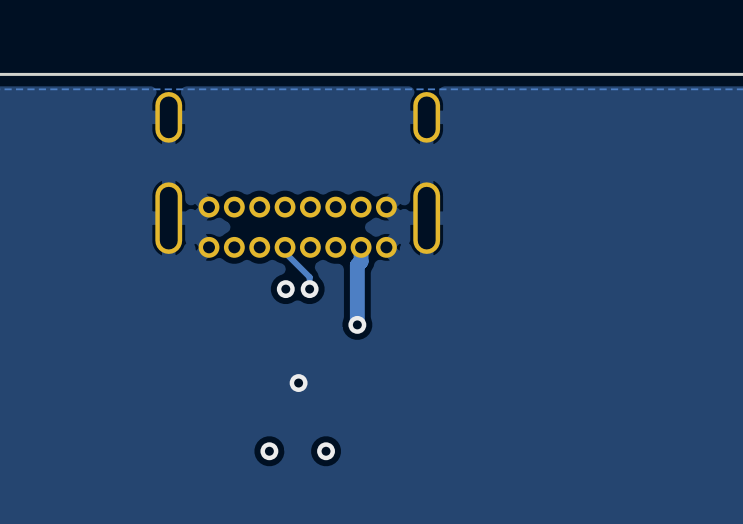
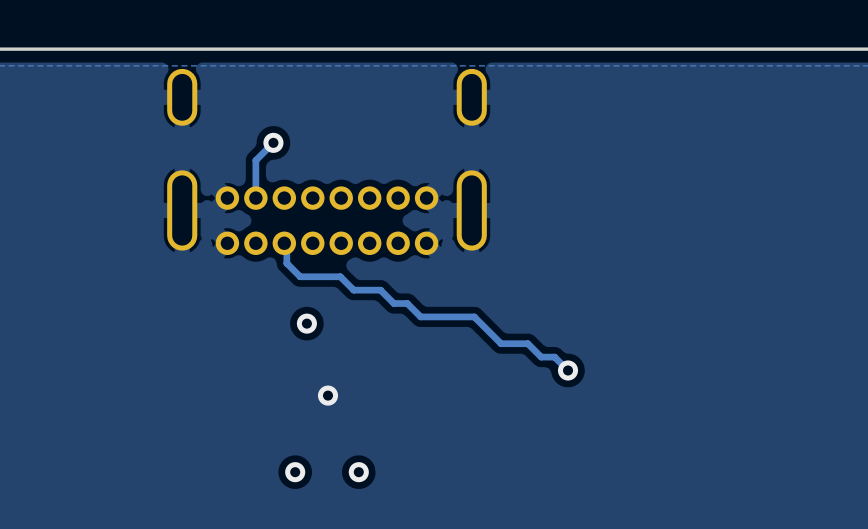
track: none -> (273, 142) (255, 160) (255, 198)
via: none -> (273, 142)
track: none -> (284, 243) (286, 245) (286, 263) (300, 276) (340, 276) (353, 290) (380, 290) (393, 303) (407, 303) (420, 316) (474, 316) (501, 343) (527, 343) (541, 357) (554, 357) (568, 370)
track: (285, 247) (285, 253) (309, 277) (309, 289) -> none
track: (361, 247) (361, 261) (357, 265) (357, 324) -> none
via: (285, 289) -> none
via: (309, 289) -> none
via: none -> (306, 323)
via: (357, 324) -> none
via: none -> (568, 370)

